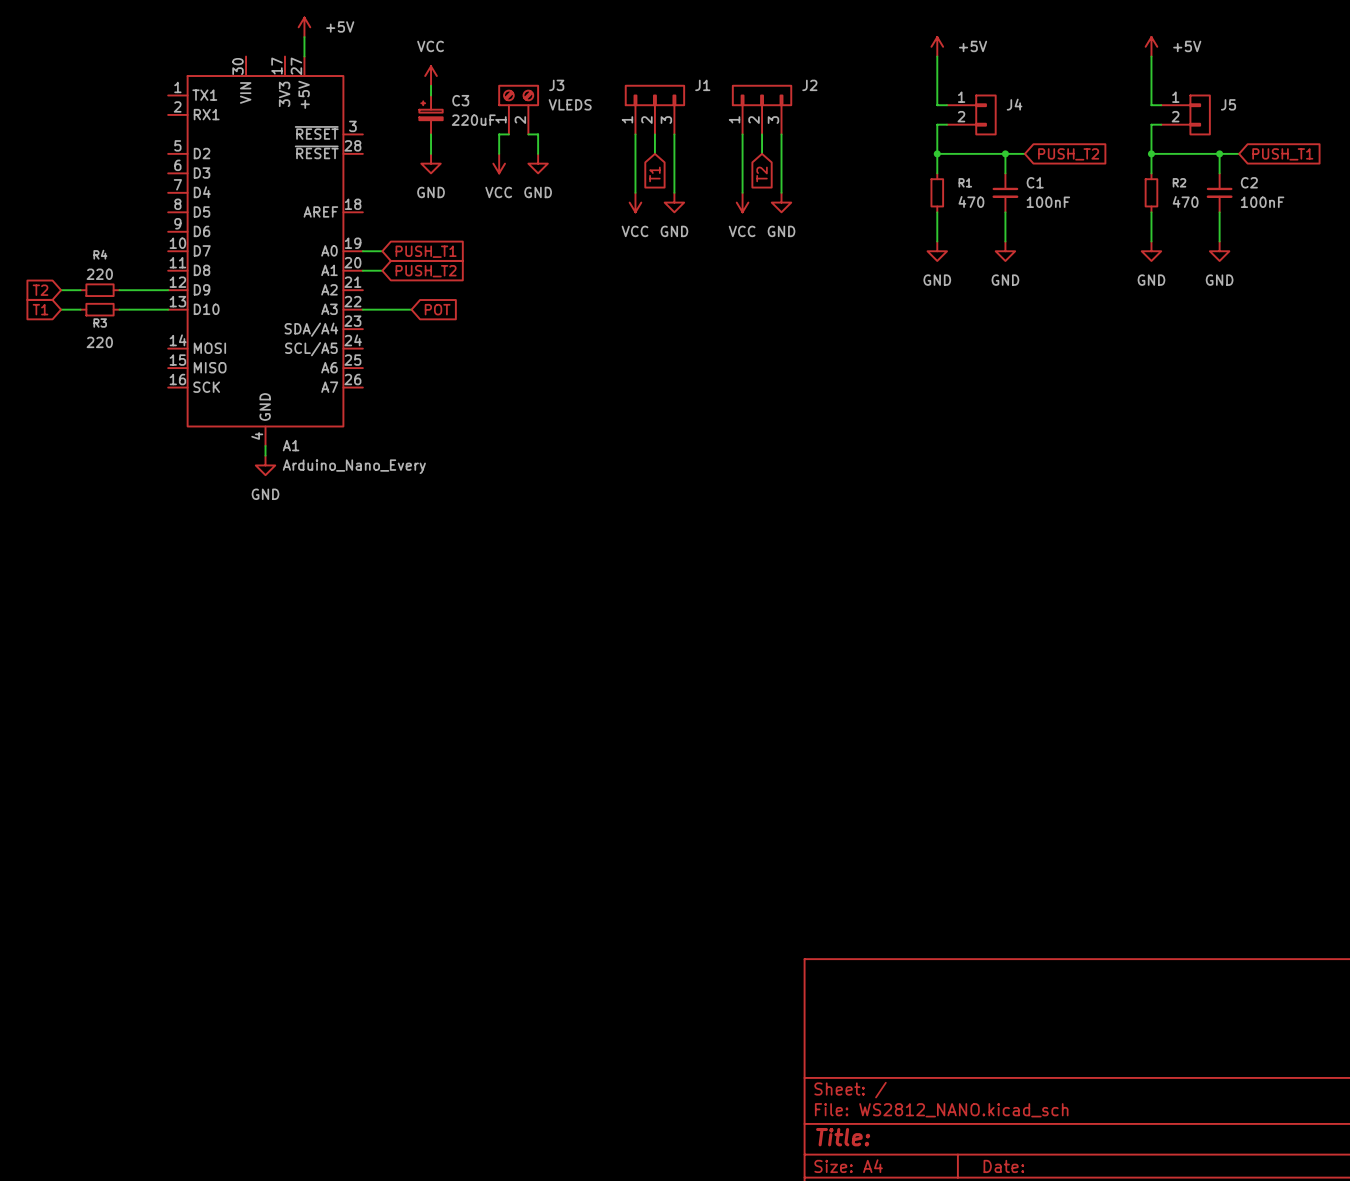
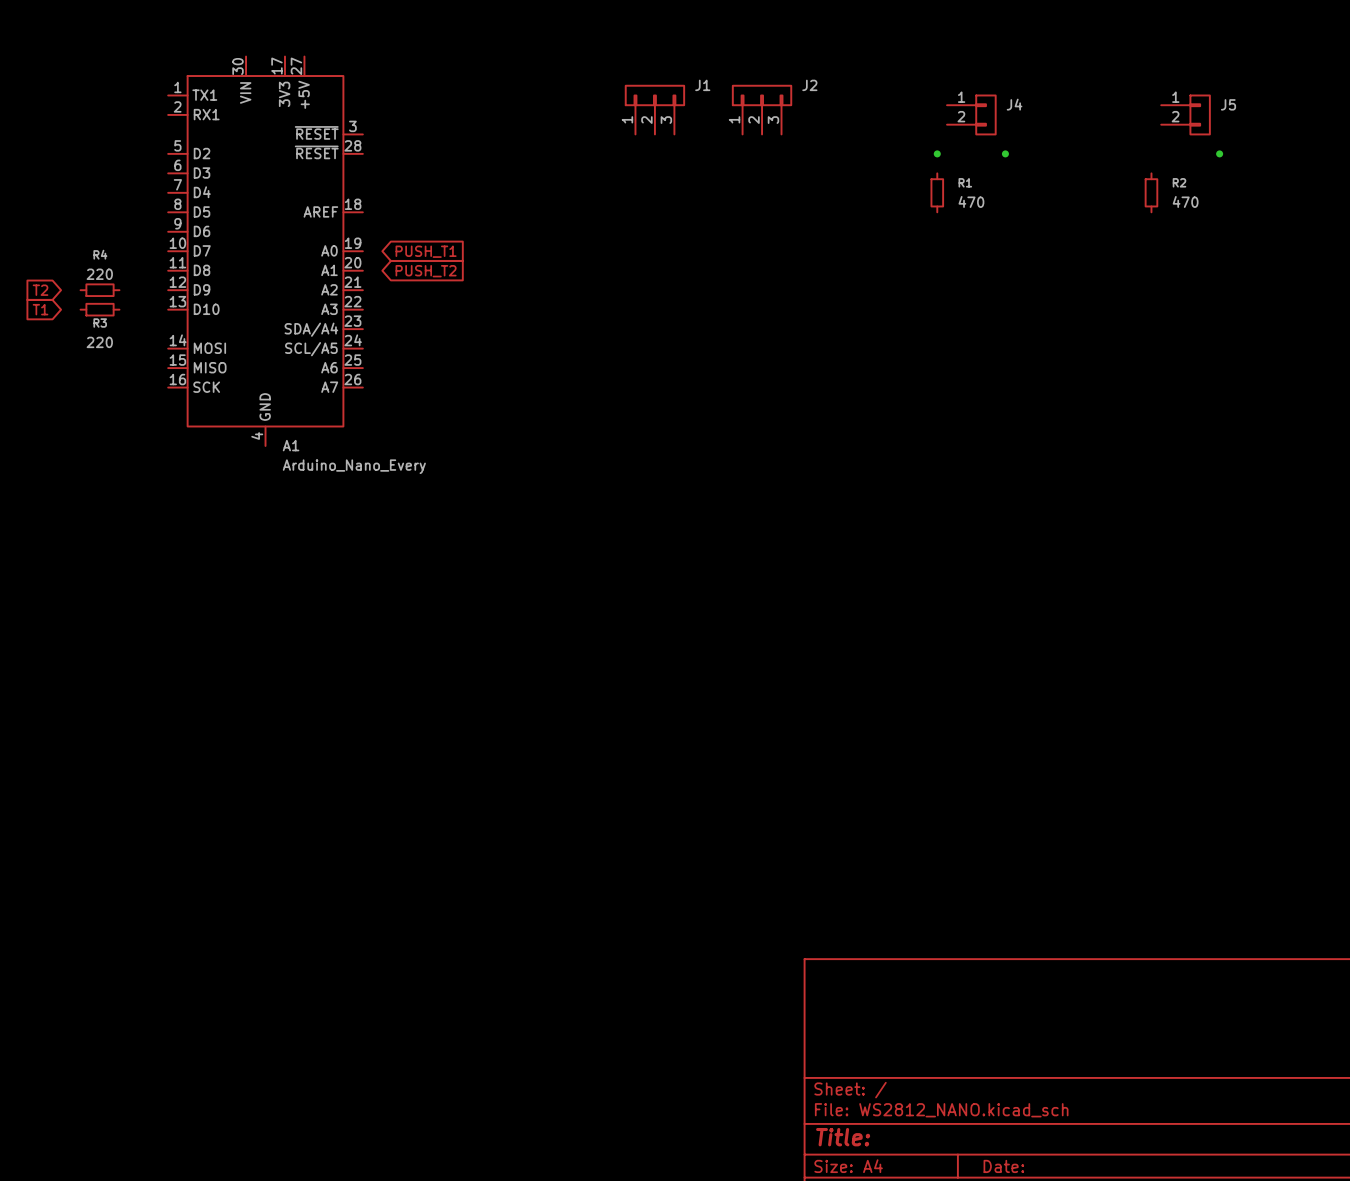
power symbol: +5V (304, 27) -> none
wire: (304, 37) (304, 56) -> none
power symbol: +5V (937, 46) -> none
power symbol: +5V (1151, 46) -> none
wire: (937, 56) (937, 105) (947, 105) -> none
wire: (1151, 56) (1151, 105) (1161, 105) -> none
power symbol: VCC (431, 76) -> none
wire: (431, 85) (431, 95) -> none
J3: VLEDS (518, 109) -> none
C3: 220uF (431, 114) -> none
wire: (947, 124) (937, 124) (937, 173) -> none
wire: (1161, 124) (1151, 124) (1151, 173) -> none
wire: (431, 134) (431, 153) -> none
wire: (508, 134) (499, 134) (499, 153) -> none
wire: (528, 134) (538, 134) (538, 153) -> none
wire: (635, 134) (635, 192) -> none
wire: (654, 134) (654, 153) -> none
wire: (674, 134) (674, 192) -> none
wire: (742, 134) (742, 192) -> none
wire: (762, 134) (762, 153) -> none
wire: (781, 134) (781, 192) -> none
wire: (937, 153) (1024, 153) -> none
wire: (1005, 153) (1005, 173) -> none
wire: (1151, 153) (1239, 153) -> none
junction: (1151, 153) -> none
wire: (1219, 153) (1219, 173) -> none
global label: PUSH_T2 (1068, 154) -> none
global label: PUSH_T1 (1282, 154) -> none
power symbol: GND (431, 163) -> none
power symbol: VCC (499, 163) -> none
power symbol: GND (538, 163) -> none
global label: T1 (654, 174) -> none
global label: T2 (762, 174) -> none
C1: 100nF (1005, 192) -> none
C2: 100nF (1219, 192) -> none
power symbol: VCC (635, 202) -> none
power symbol: GND (674, 202) -> none
power symbol: VCC (742, 202) -> none
power symbol: GND (781, 202) -> none
wire: (937, 212) (937, 241) -> none
wire: (1005, 212) (1005, 241) -> none
wire: (1151, 212) (1151, 241) -> none
wire: (1219, 212) (1219, 241) -> none
wire: (362, 251) (382, 251) -> none
power symbol: GND (937, 251) -> none
power symbol: GND (1005, 251) -> none
power symbol: GND (1151, 251) -> none
power symbol: GND (1219, 251) -> none
wire: (362, 270) (382, 270) -> none
wire: (61, 290) (80, 290) -> none
wire: (119, 290) (168, 290) -> none
wire: (61, 309) (80, 309) -> none
wire: (119, 309) (168, 309) -> none
wire: (362, 309) (411, 309) -> none
global label: POT (437, 309) -> none
wire: (265, 445) (265, 455) -> none
power symbol: GND (265, 465) -> none

